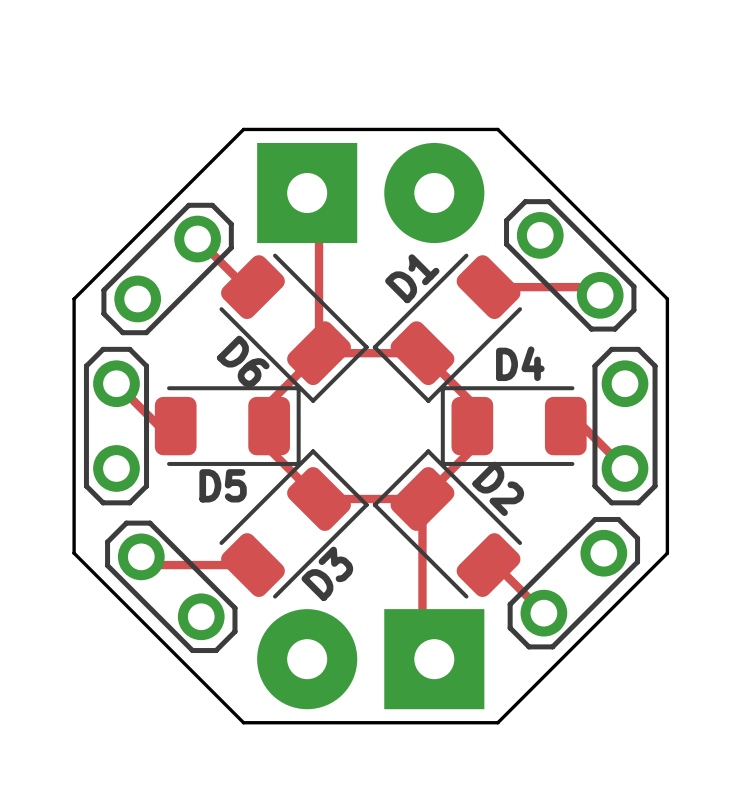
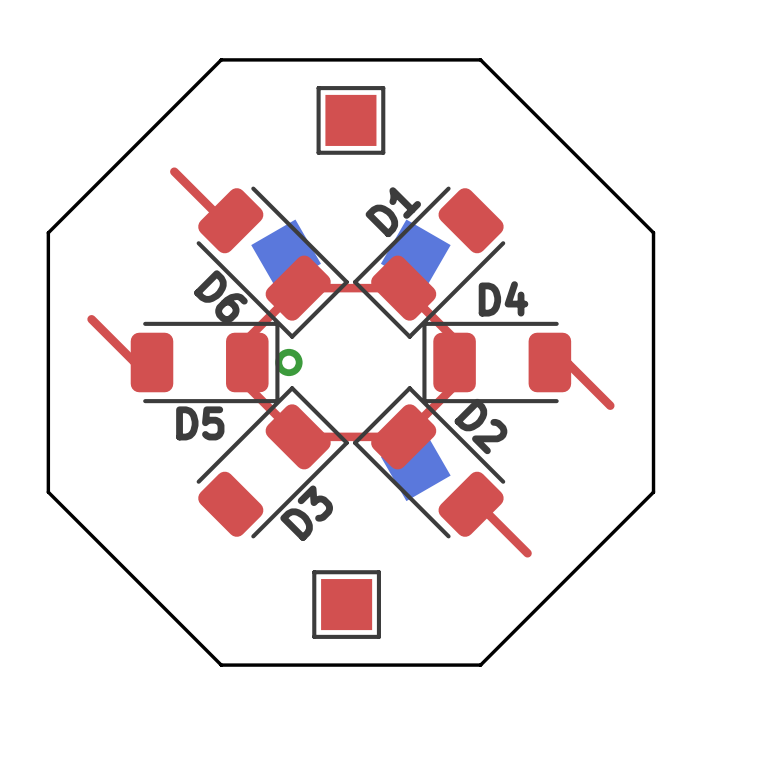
part footprint: [257, 142, 485, 244] -> [316, 86, 386, 155]
top track: (307, 193) (319, 204) (319, 353) -> none
part: (570, 265) -> none
part: (167, 268) -> none
top track: (488, 287) (591, 287) (600, 295) -> none
part: none -> (286, 254)
part: none -> (415, 254)
part: (116, 426) -> none
via: none -> (288, 362)
part: (625, 426) -> none
top track: (422, 499) (422, 647) (434, 659) -> none
part: none -> (415, 466)
top track: (141, 556) (149, 565) (252, 565) -> none
part: (573, 583) -> none
part: (171, 586) -> none
part footprint: [257, 609, 485, 710] -> [312, 570, 381, 639]

